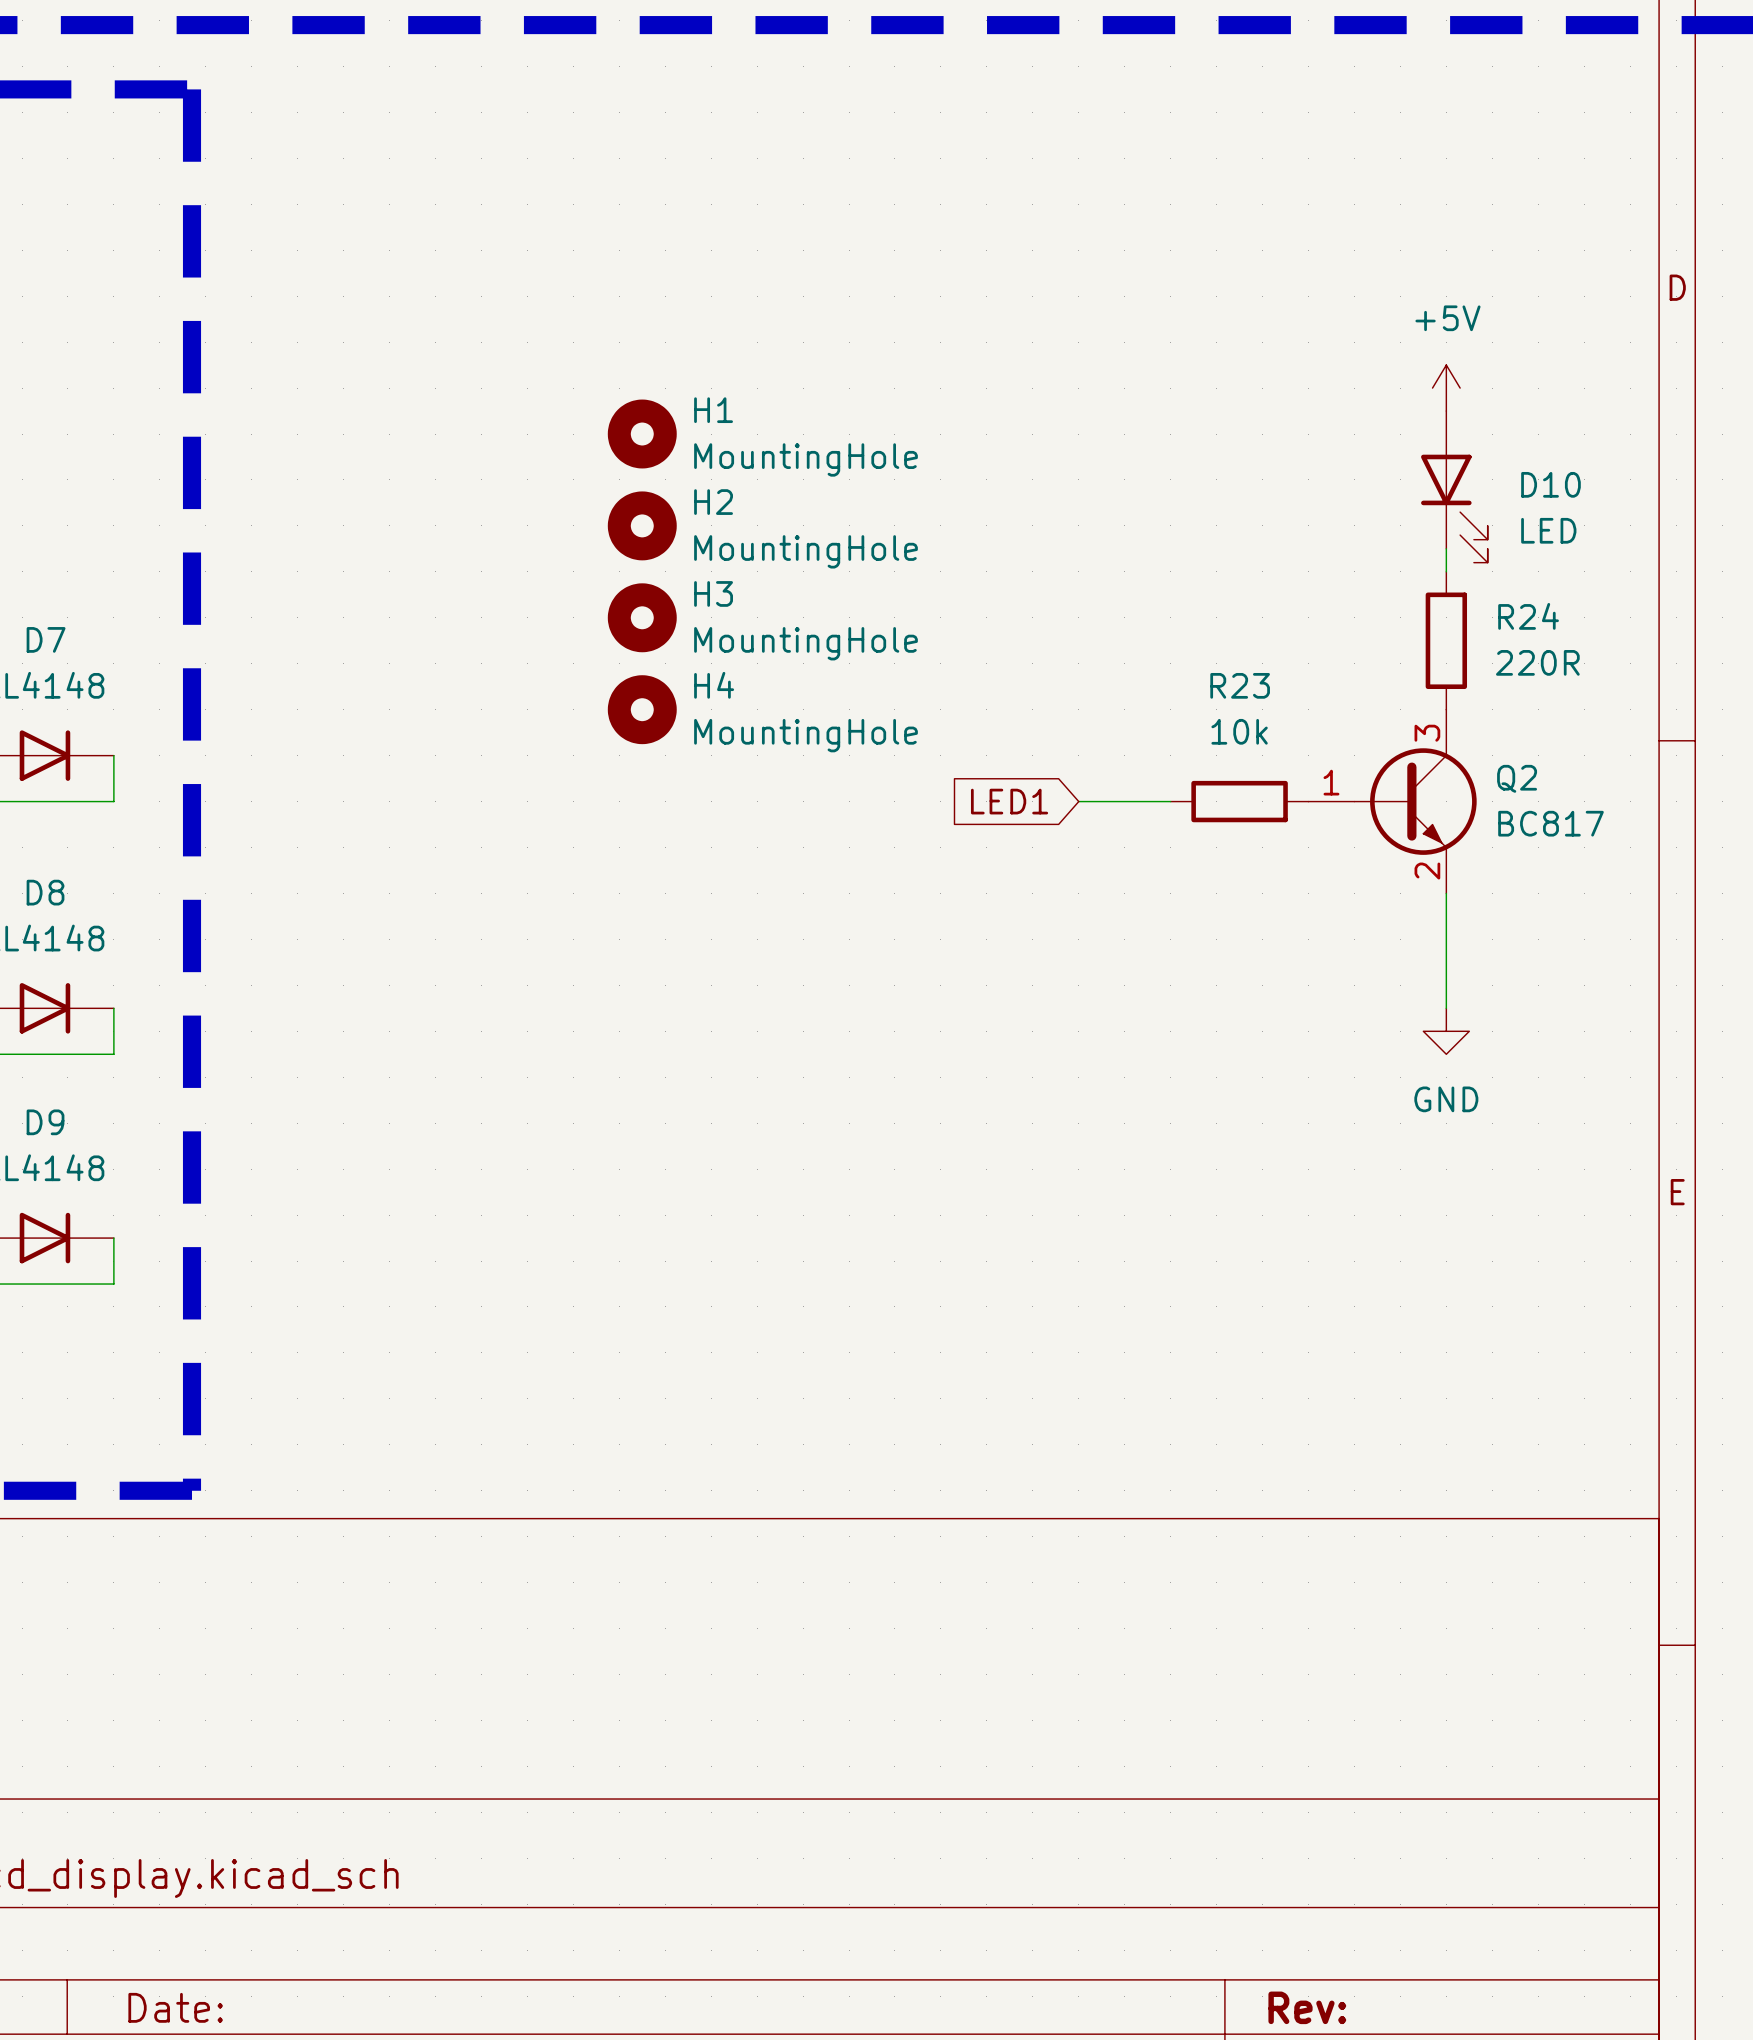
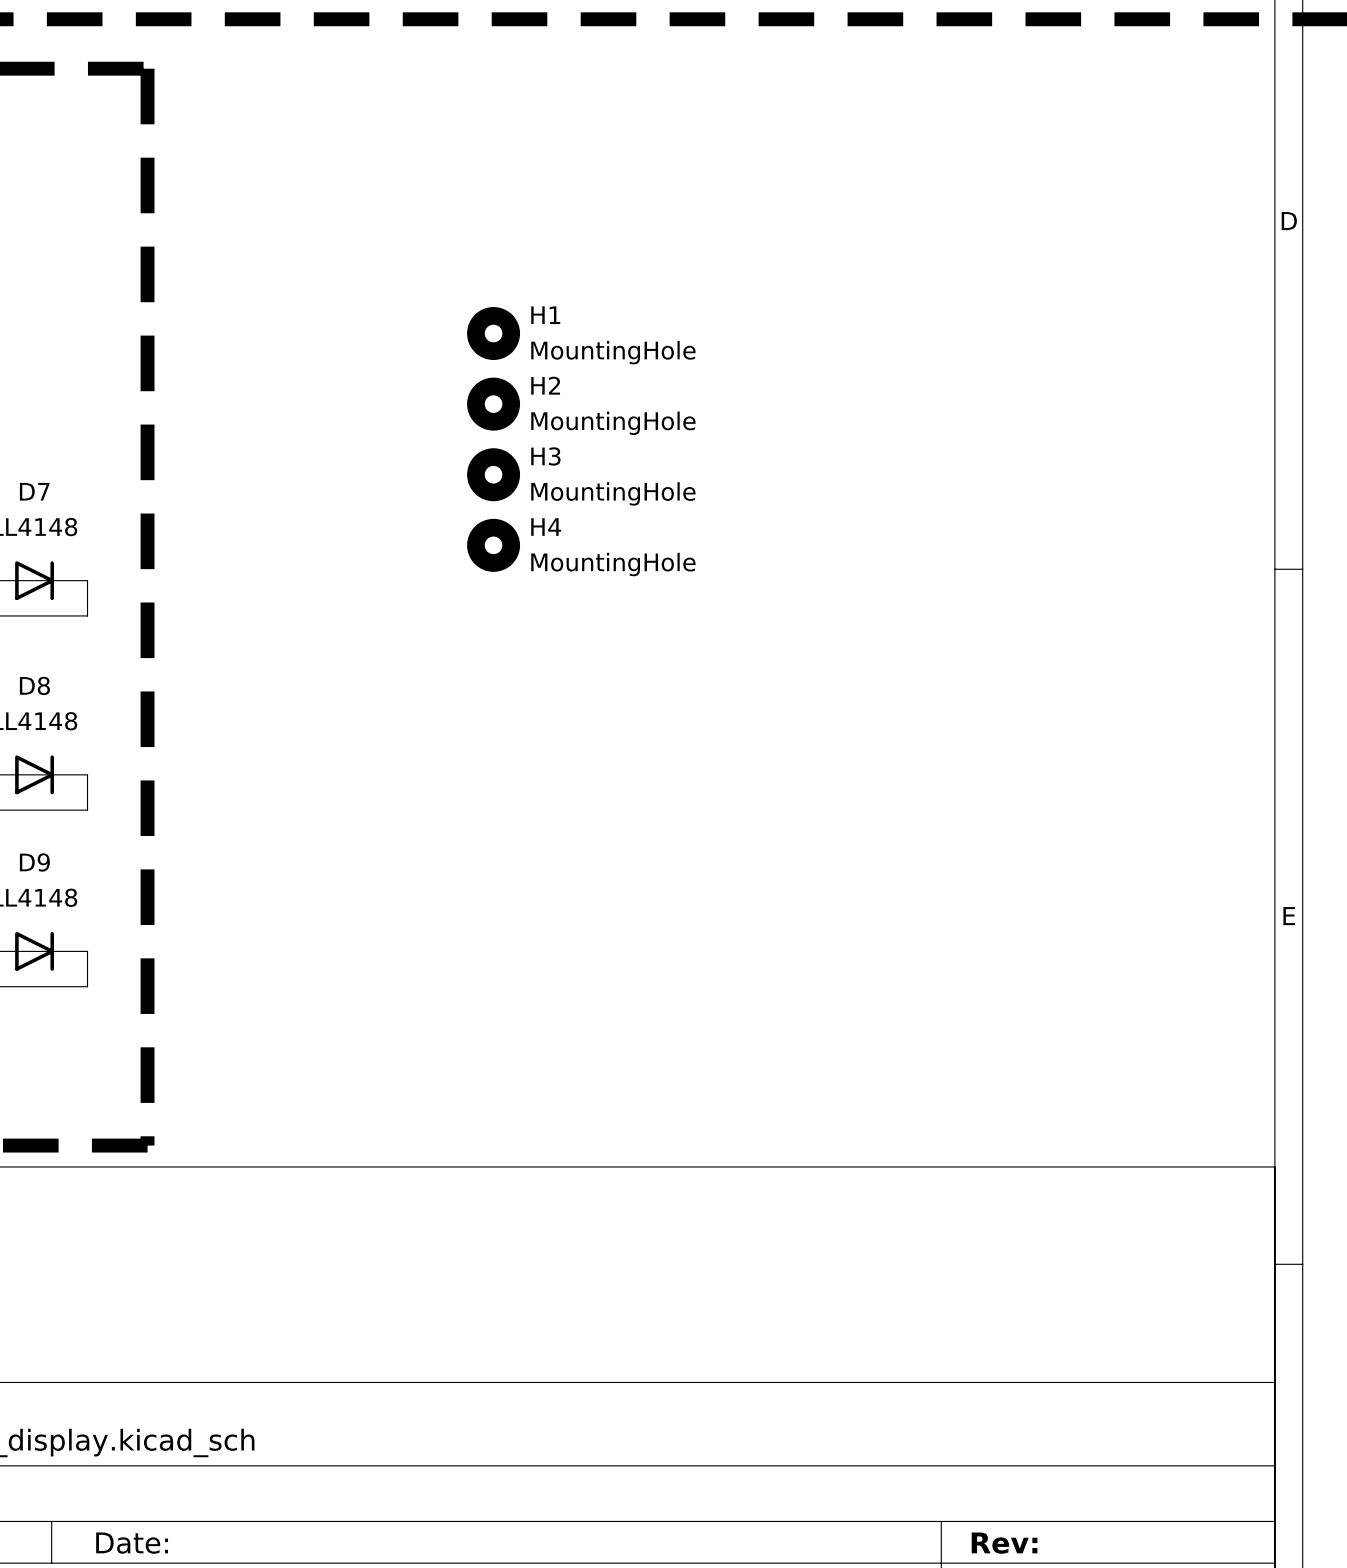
power symbol: +5V (1446, 388) -> none
D10: LED (1454, 486) -> none
wire: (1446, 548) (1446, 571) -> none
R24: 220R (1446, 640) -> none
global label: LED1 (1009, 801) -> none
wire: (1078, 801) (1170, 801) -> none
R23: 10k (1239, 801) -> none
Q2: BC817 (1392, 801) -> none
wire: (1446, 893) (1446, 1008) -> none
power symbol: GND (1446, 1031) -> none

